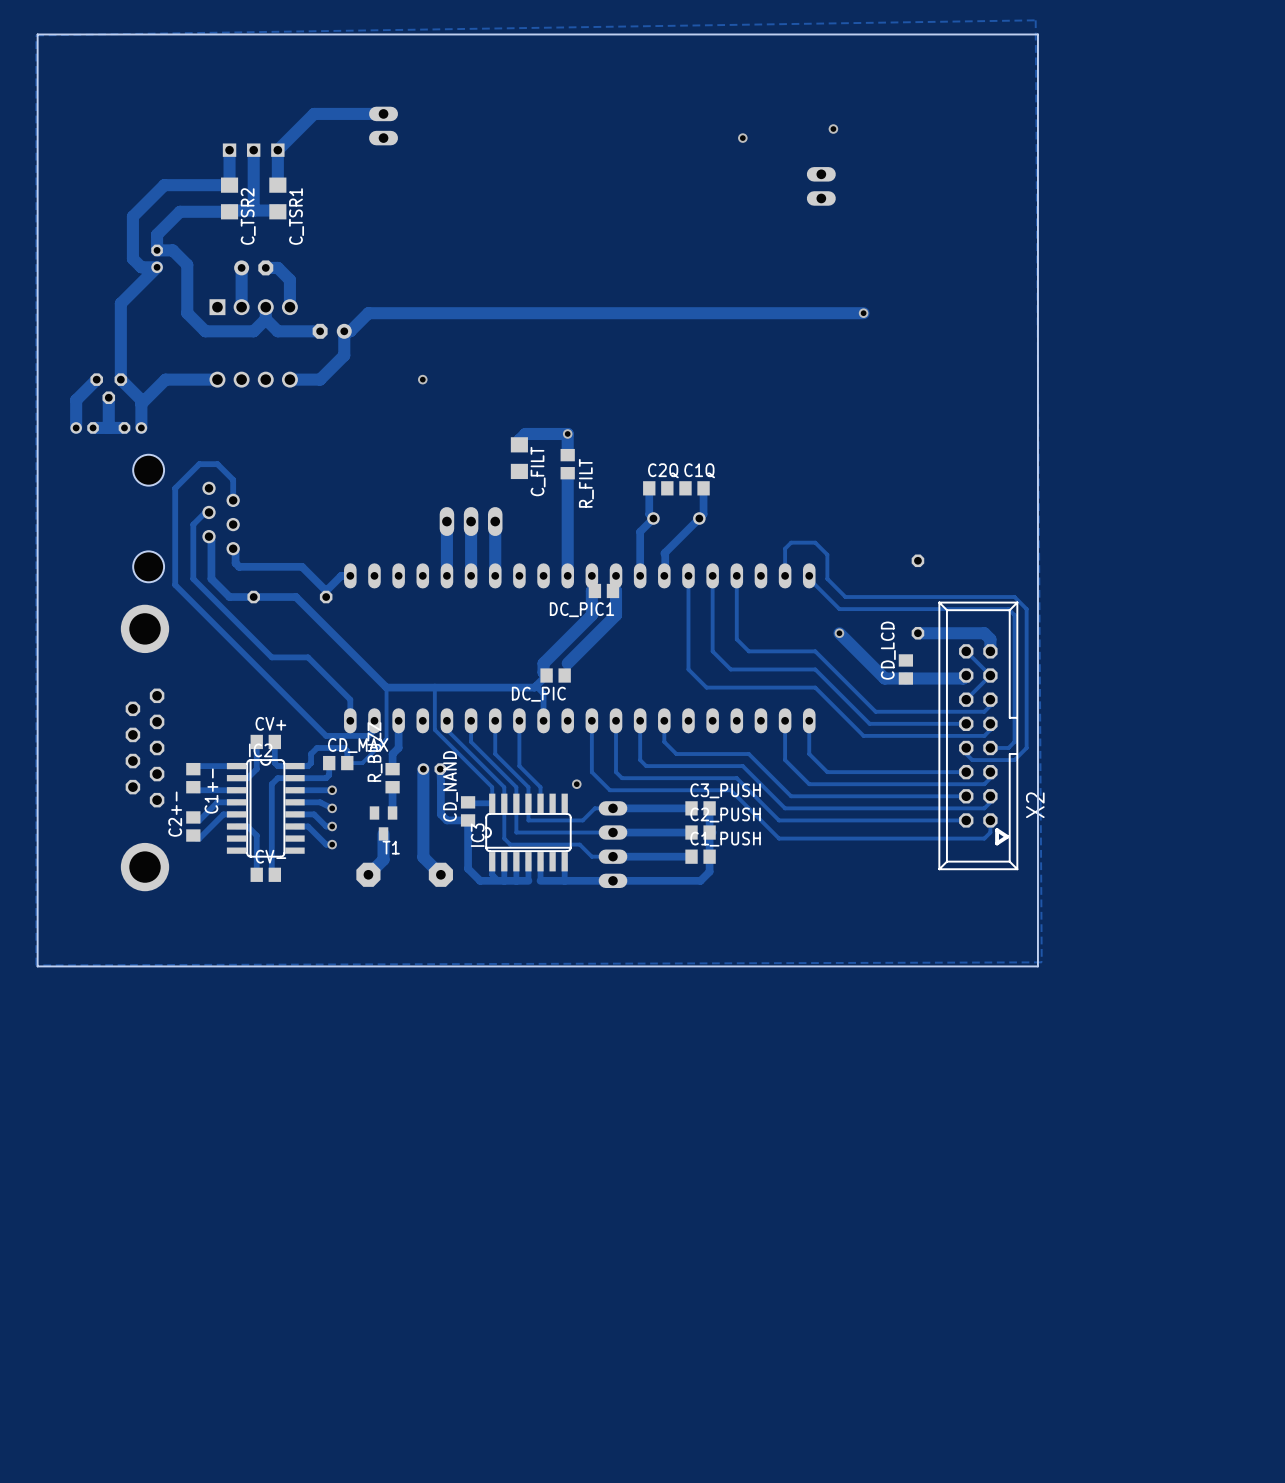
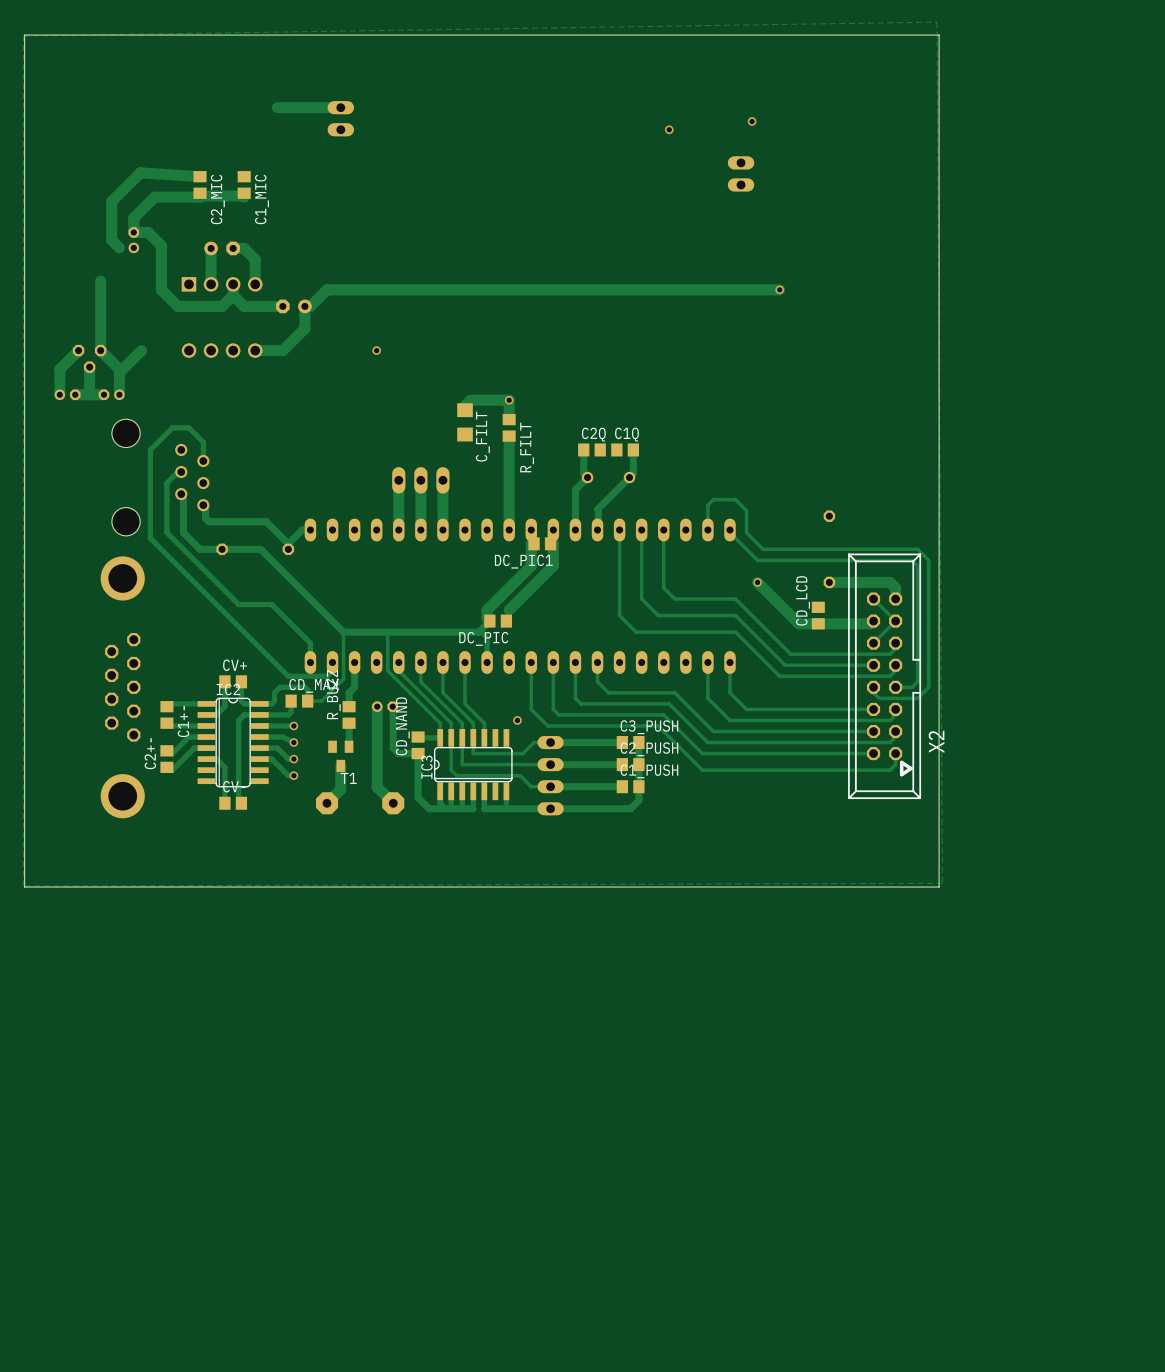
track: (314, 113) (277, 150) (277, 185) -> none
track: (229, 150) (229, 185) (164, 185) -> (200, 176) (140, 172)
track: (253, 150) (253, 210) -> none
part: (253, 150) -> none
C_TSR2: (229, 198) -> none
C2_MIC: none -> (200, 184)
C_TSR1: (277, 198) -> none
C1_MIC: none -> (244, 184)
track: (141, 267) (157, 267) (120, 303) -> none
track: (217, 379) (165, 379) -> none

